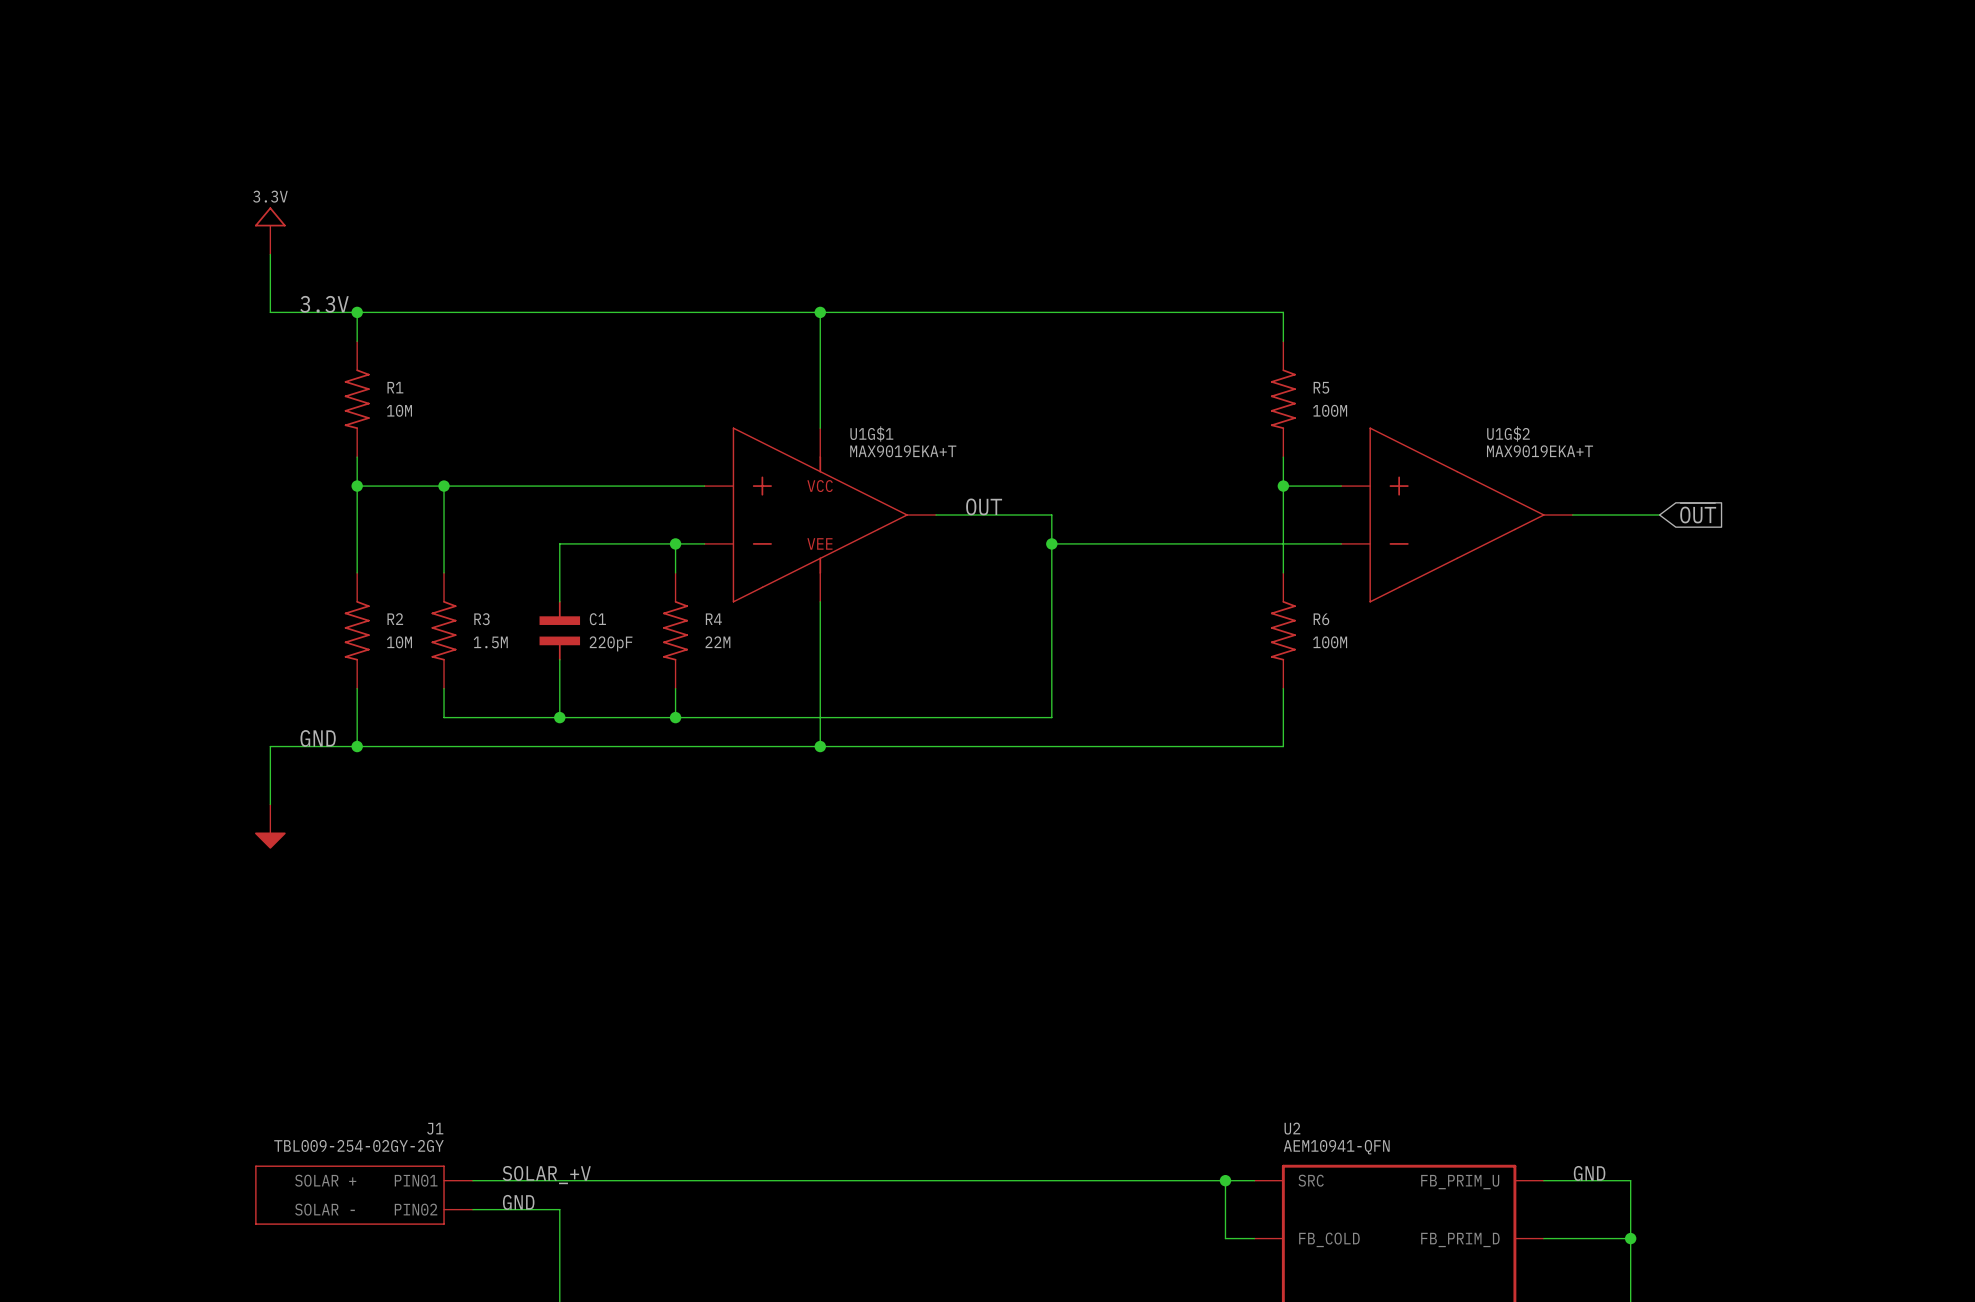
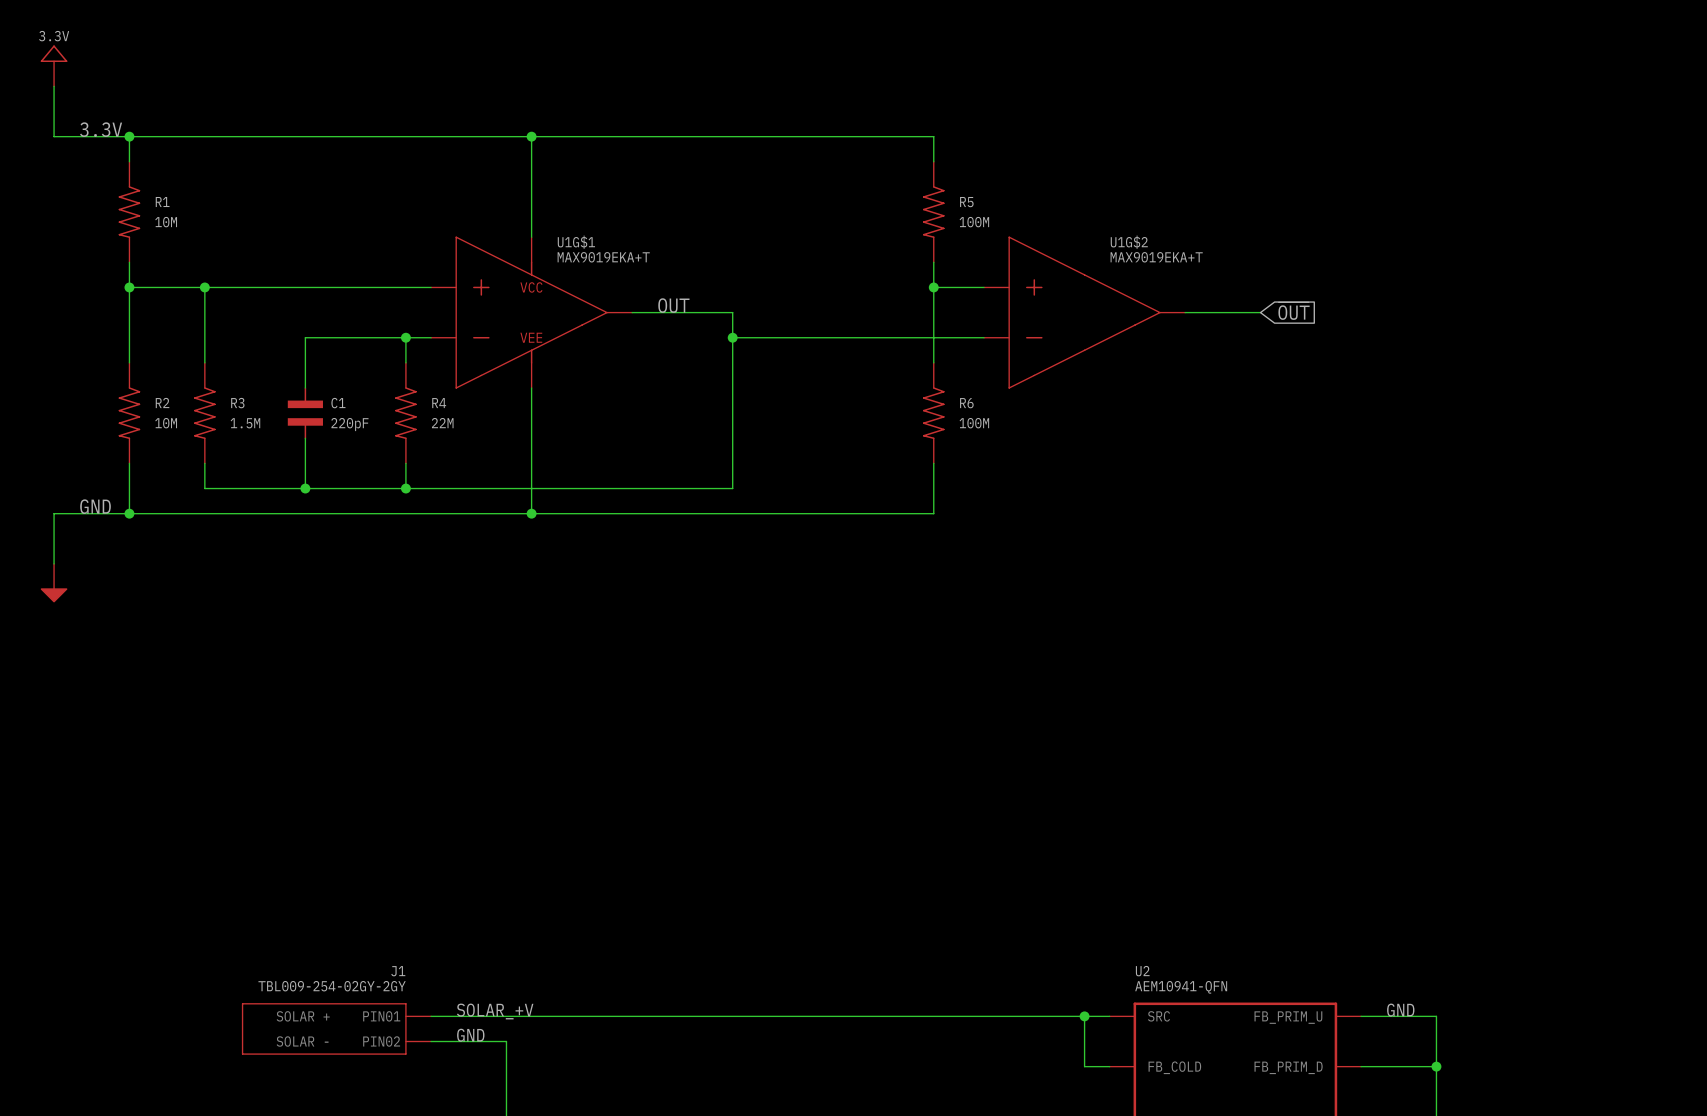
junction: none -> (129, 136)
wire: none -> (531, 136) (531, 237)
junction: none -> (531, 136)
power symbol position: 3.3V (270, 230) -> 3.3V (54, 65)
wire: (270, 254) (270, 312) (1283, 312) (1283, 341) -> (54, 86) (54, 136) (933, 136) (933, 161)
label position: 3.3V (324, 304) -> 3.3V (101, 129)
wire: (357, 312) (357, 341) -> (129, 136) (129, 161)
junction: (357, 312) -> none
wire: (820, 312) (820, 370) -> (632, 312) (732, 312)
junction: (820, 312) -> none
junction: none -> (129, 287)
wire: none -> (204, 287) (204, 362)
junction: none -> (204, 287)
junction: none -> (933, 287)
R1 position: (357, 399) -> (129, 212)
junction: none -> (405, 337)
wire: none -> (732, 337) (984, 337)
junction: none -> (732, 337)
R5 position: (1283, 399) -> (933, 212)
wire: none -> (732, 362) (732, 488) (204, 488) (204, 463)
wire: (357, 457) (357, 572) -> (129, 262) (129, 362)
wire: (1283, 457) (1283, 572) -> (933, 262) (933, 362)
wire: (357, 486) (704, 486) -> (129, 287) (431, 287)
junction: (357, 486) -> none
junction: (444, 486) -> none
wire: (1283, 486) (1341, 486) -> (933, 287) (984, 287)
junction: (1283, 486) -> none
label position: OUT (984, 506) -> OUT (673, 305)
global label position: ~{OUT} (1698, 513) -> ~{OUT} (1294, 311)
U1G$1 position: (820, 515) -> (531, 312)
wire: (936, 515) (1051, 515) (1051, 543) (1341, 543) -> none
U1G$2 position: (1457, 515) -> (1084, 312)
wire: (1572, 515) (1659, 515) -> (1185, 312) (1260, 312)
wire: (675, 543) (675, 572) -> (405, 337) (405, 362)
junction: (675, 543) -> none
wire: (704, 543) (559, 543) (559, 601) -> (431, 337) (305, 337) (305, 388)
junction: (1051, 543) -> none
junction: none -> (305, 488)
junction: none -> (405, 488)
junction: none -> (129, 513)
junction: none -> (531, 513)
wire: (820, 601) (820, 746) -> (531, 388) (531, 513)
wire: (1051, 601) (1051, 717) (444, 717) (444, 688) -> (933, 513) (54, 513) (54, 563)
R2 position: (357, 630) -> (129, 413)
R3 position: (444, 630) -> (204, 413)
C1 position: (559, 630) -> (305, 413)
R4 position: (675, 630) -> (405, 413)
R6 position: (1283, 630) -> (933, 413)
wire: (559, 659) (559, 717) -> (305, 438) (305, 488)
wire: (357, 688) (357, 746) -> (129, 463) (129, 513)
wire: (675, 688) (675, 717) -> none
wire: (1283, 688) (1283, 746) (270, 746) (270, 804) -> none
junction: (559, 717) -> none
junction: (675, 717) -> none
label position: GND (318, 738) -> GND (95, 506)
junction: (357, 746) -> none
junction: (820, 746) -> none
power symbol position: (270, 826) -> (54, 583)

